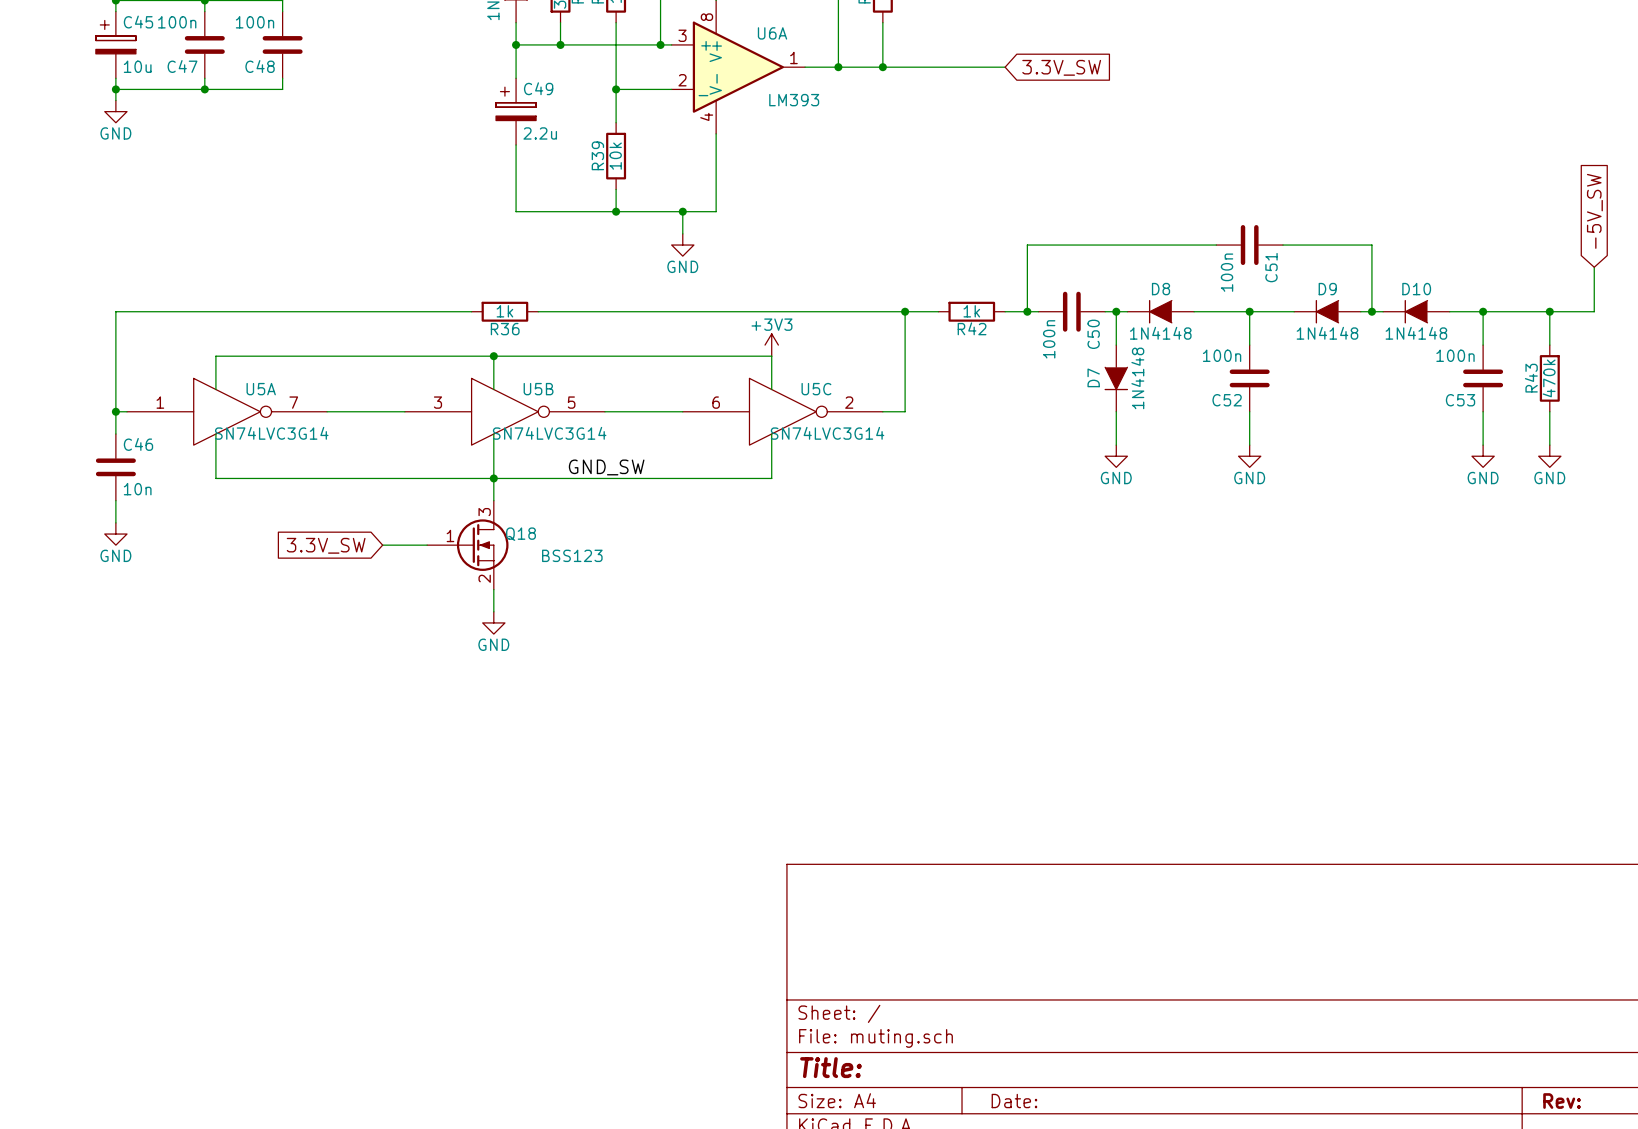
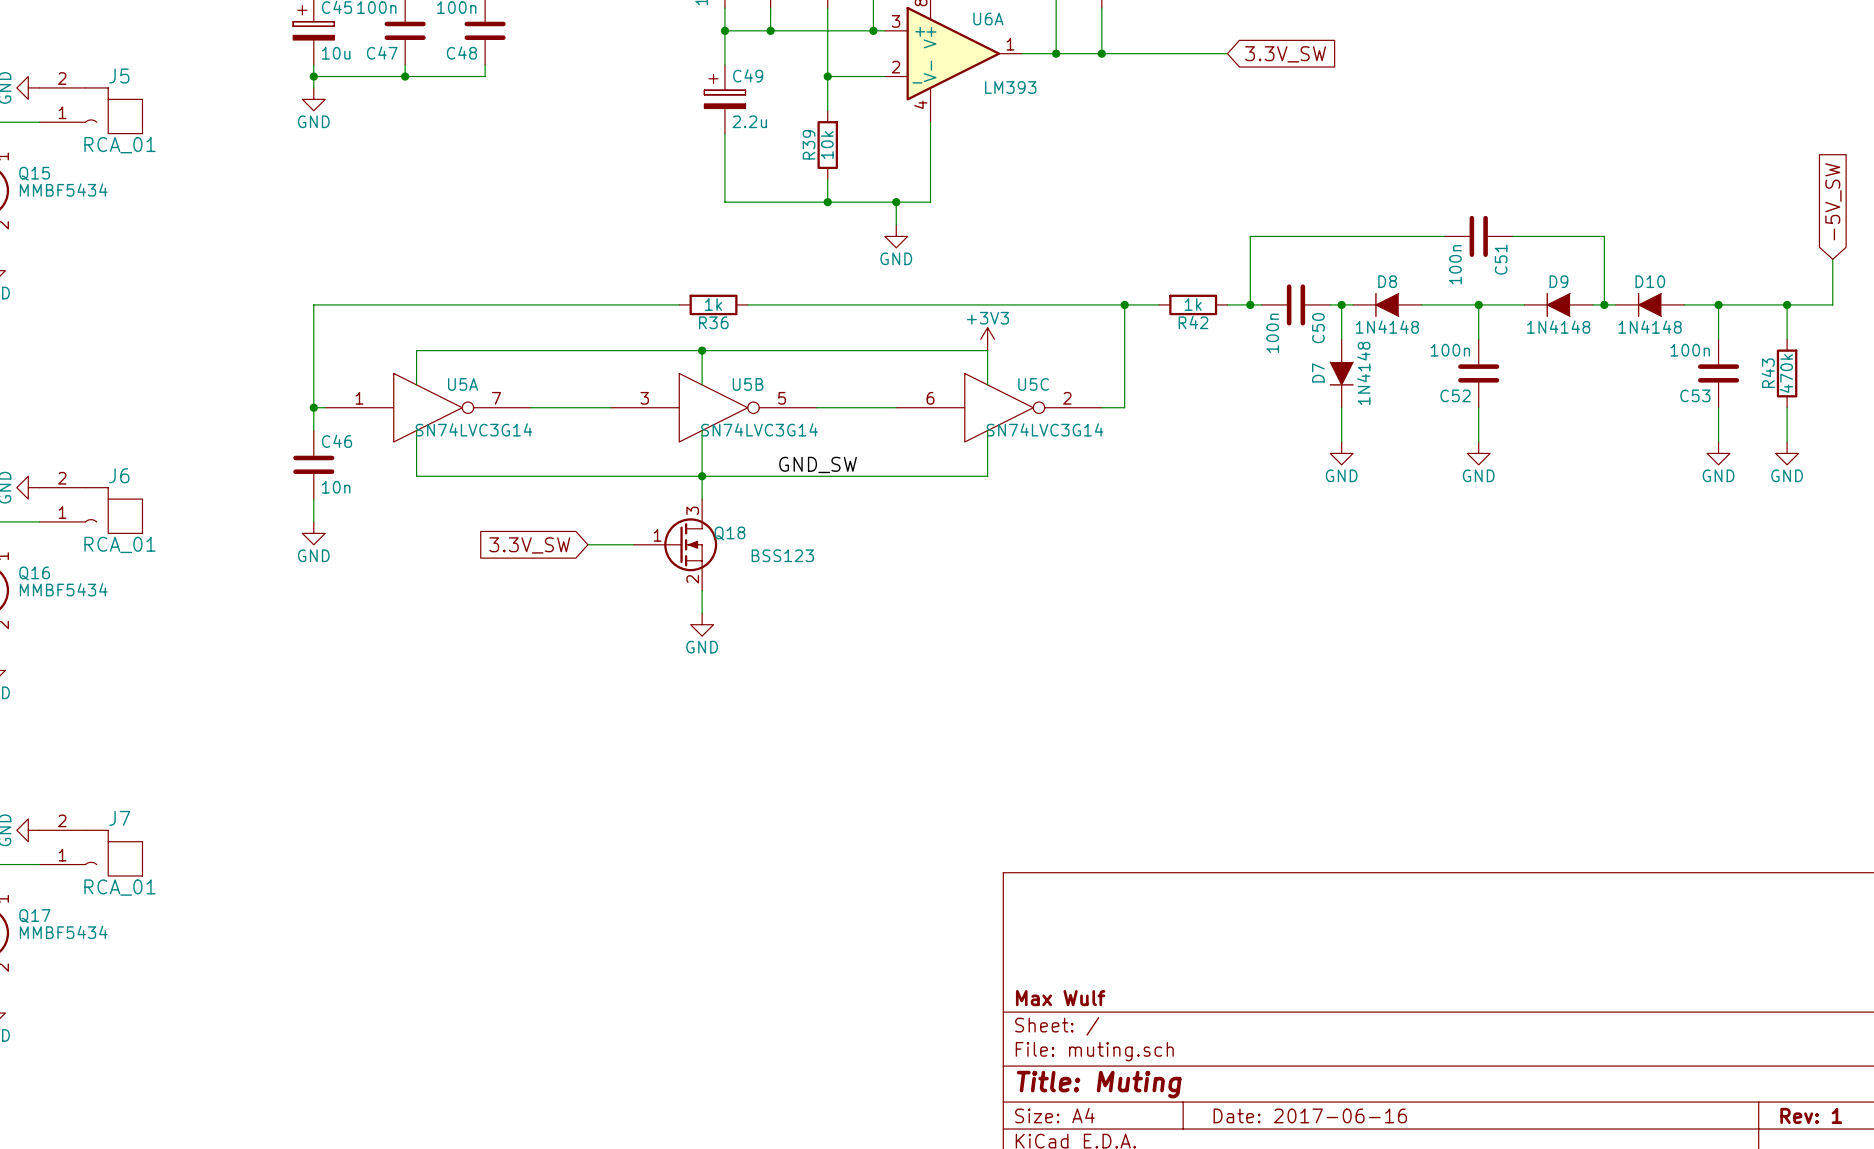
title block: none -> Max Wulf (1060, 998)
title block: Title: (830, 1067) -> Title: Muting (1099, 1084)
title block: Date: (1014, 1101) -> Date: 2017-06-16 (1310, 1115)
title block: Rev: (1562, 1101) -> Rev: 1 (1811, 1115)

